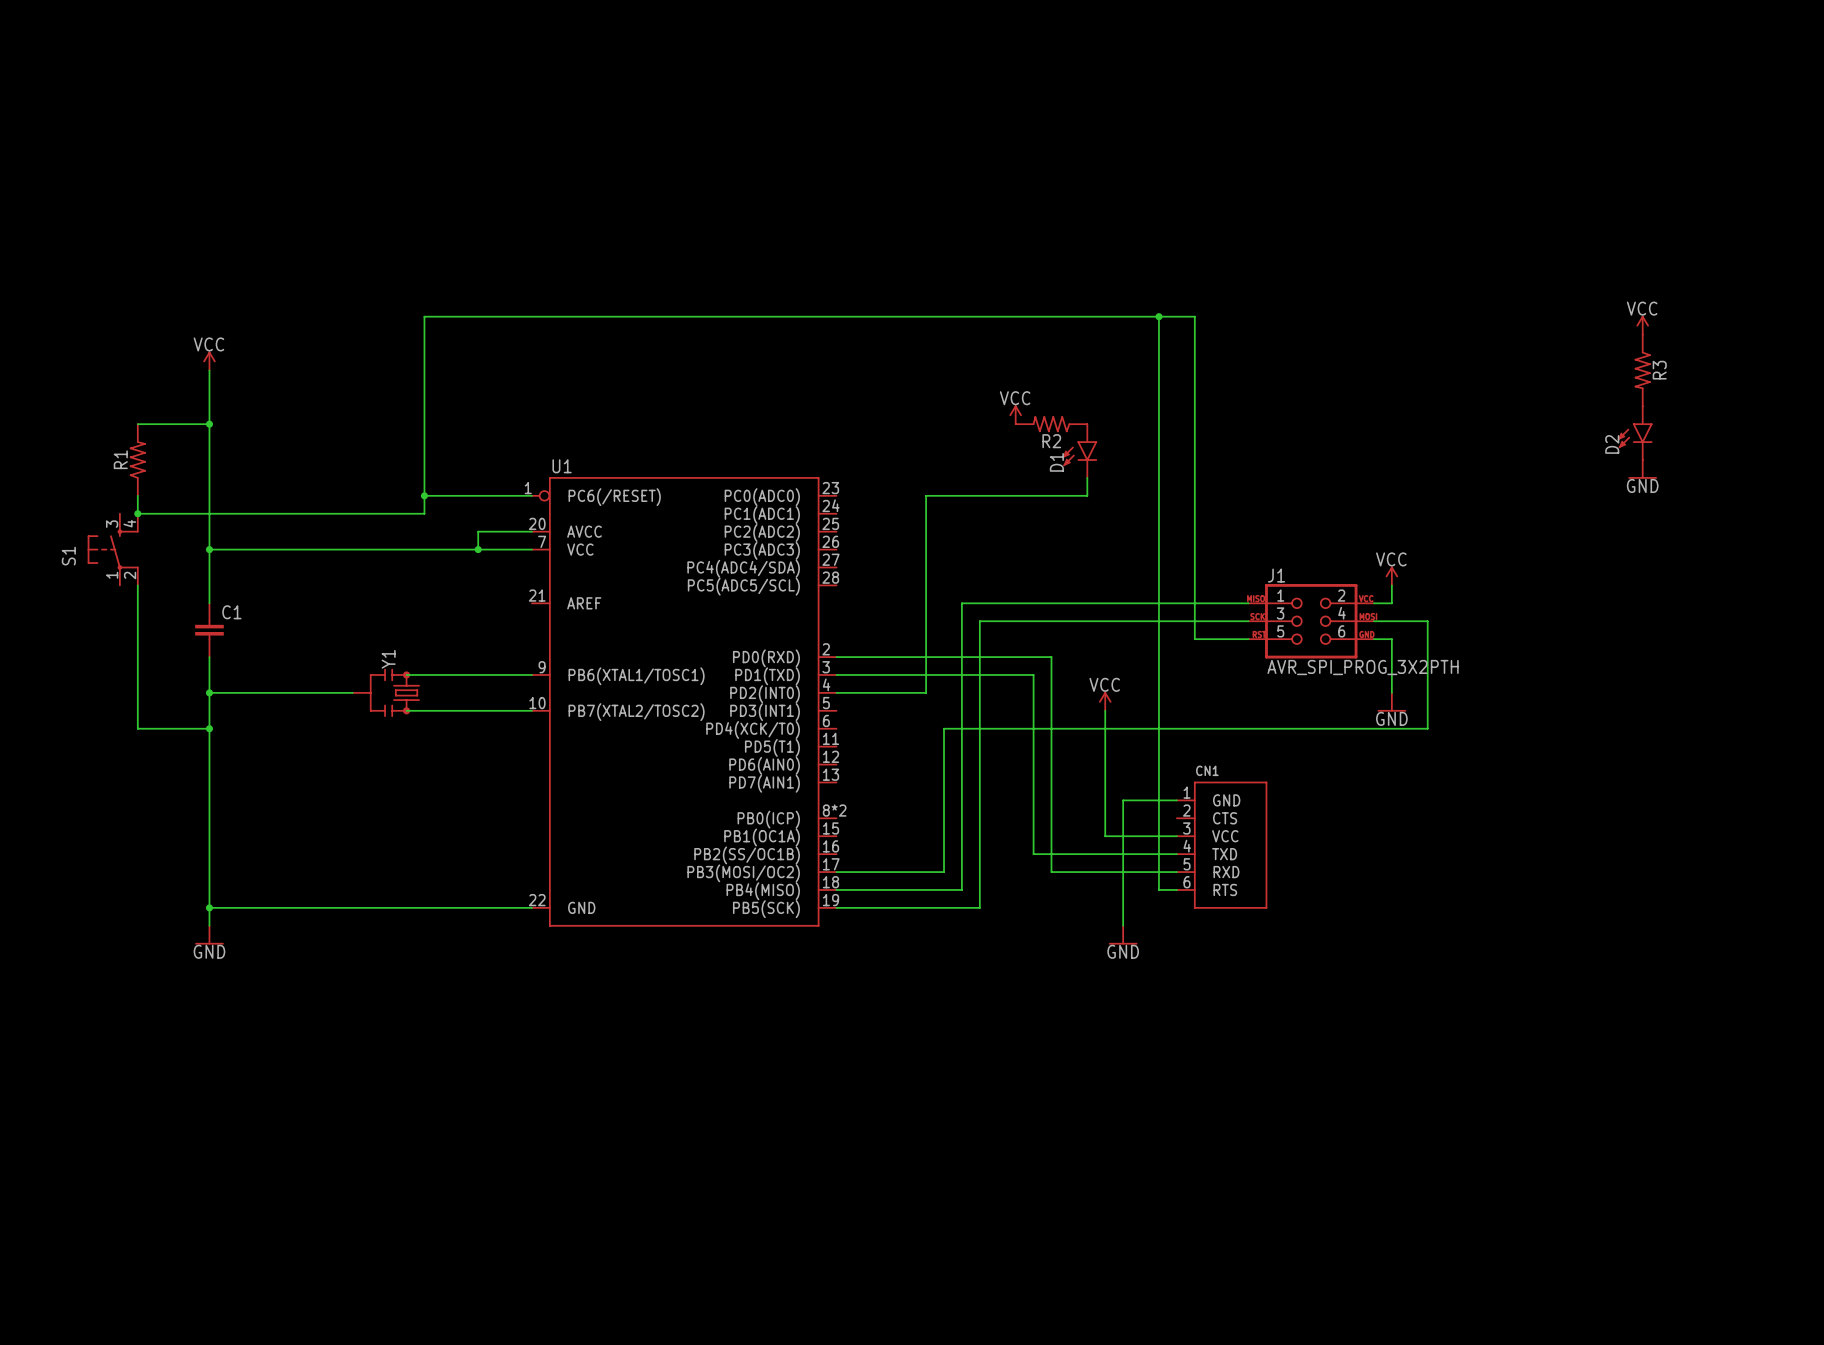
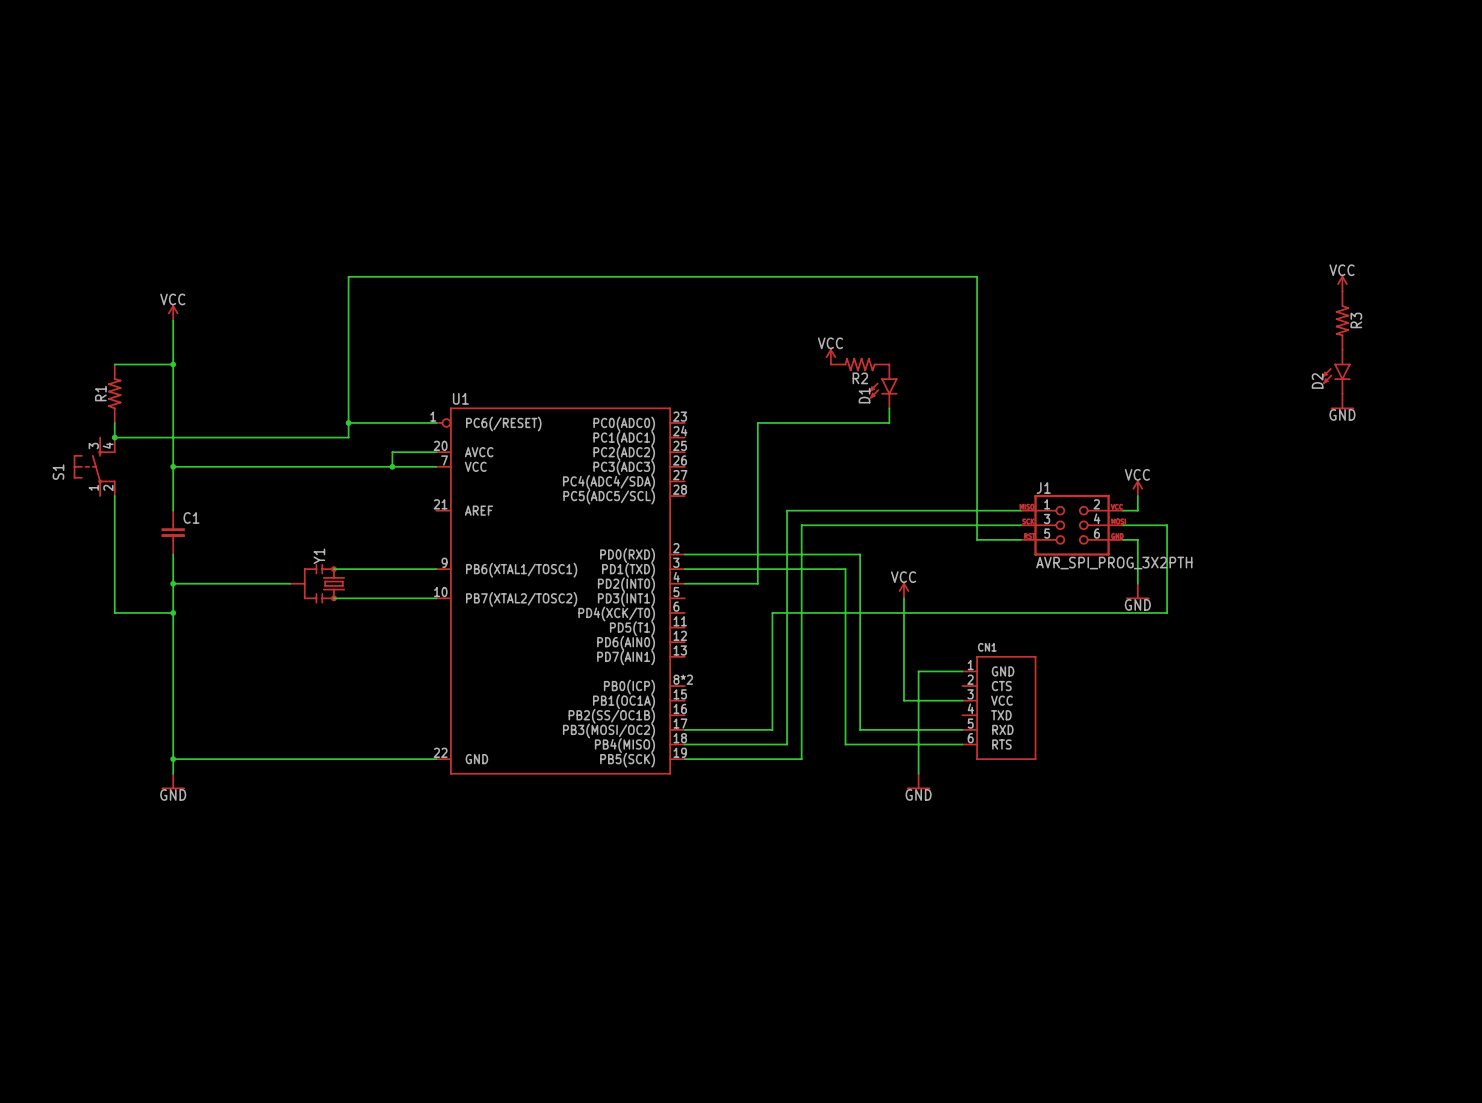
wire: (1158, 316) (1158, 889) -> none
junction: (1158, 316) -> none
wire: (1033, 854) (1176, 854) -> (845, 715) (845, 744) (947, 744)

